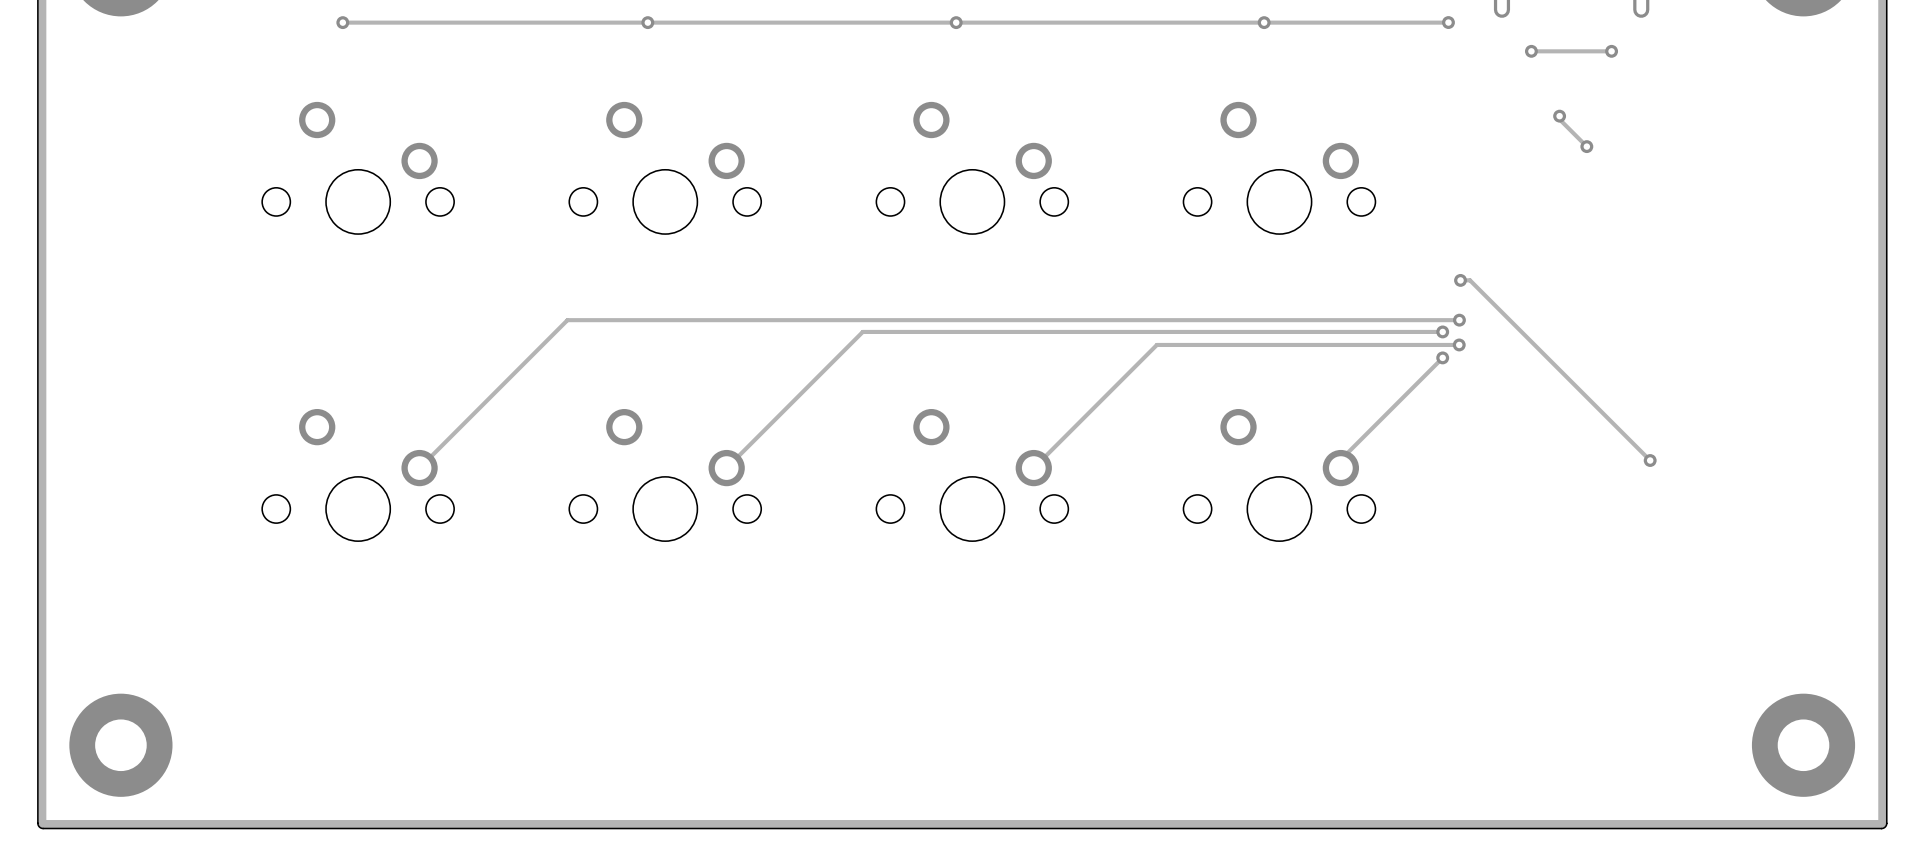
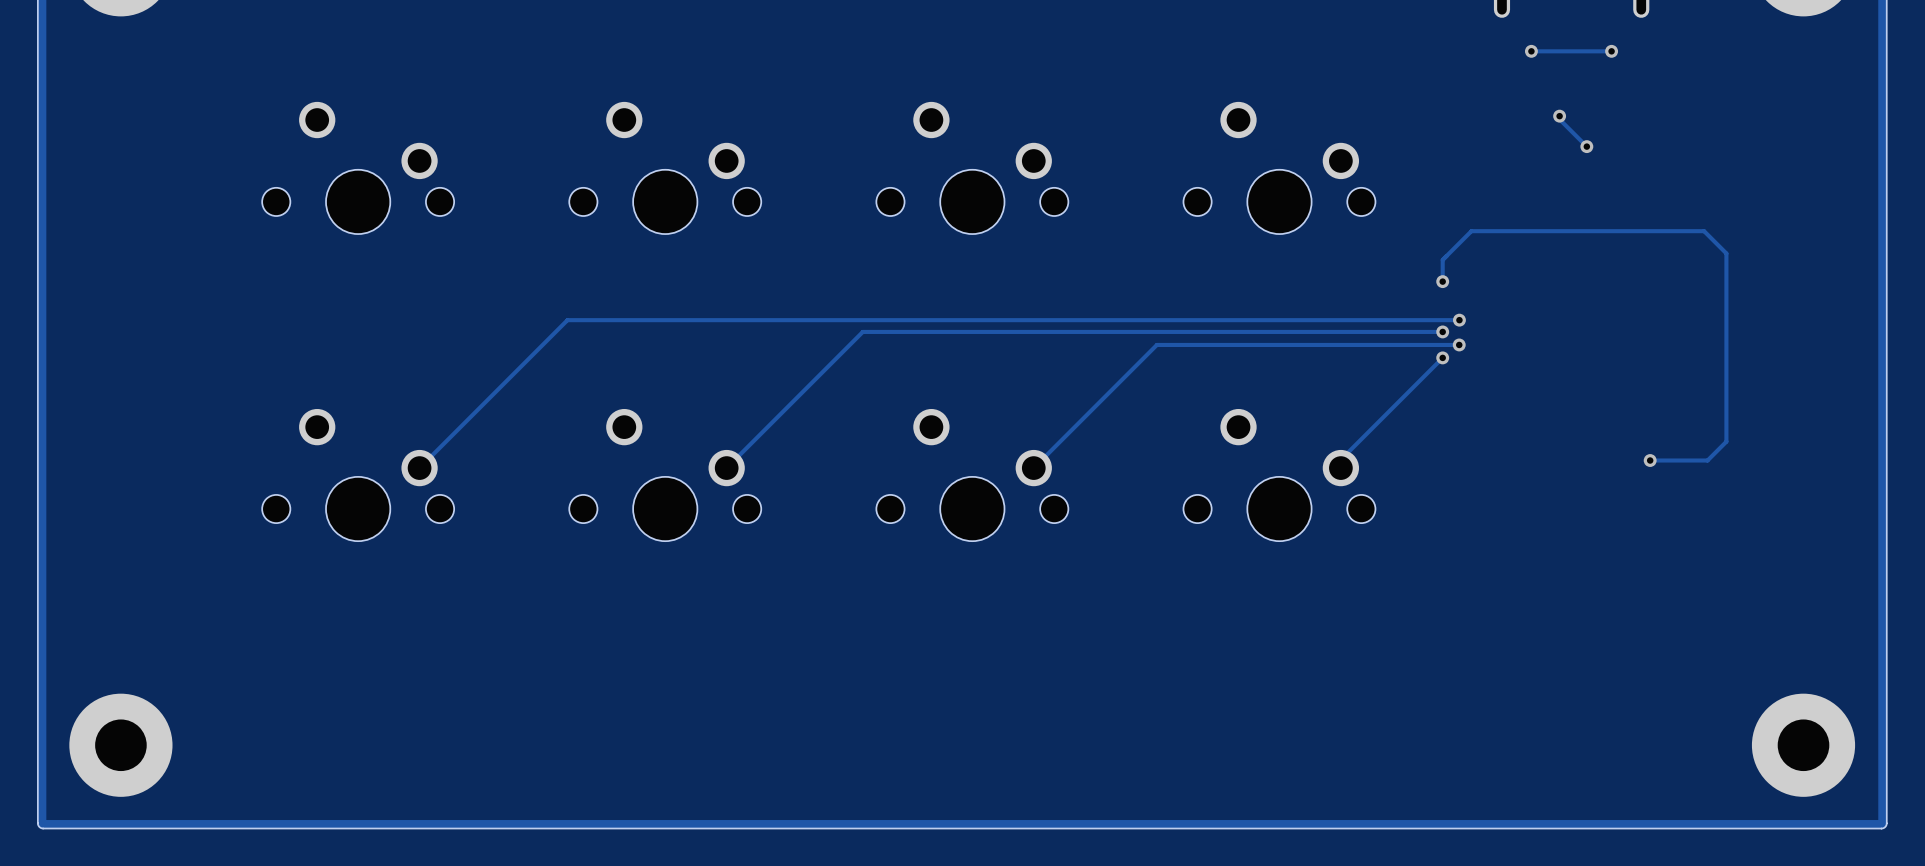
via: (342, 22) -> none
via: (647, 22) -> none
via: (956, 22) -> none
via: (1264, 22) -> none
track: (1448, 22) (342, 22) -> none
via: (1448, 22) -> none
track: (1460, 280) (1470, 280) (1650, 460) -> (1442, 281) (1442, 259) (1471, 231) (1704, 231) (1726, 253) (1726, 441) (1707, 460) (1650, 460)
via position: (1460, 280) -> (1442, 281)

